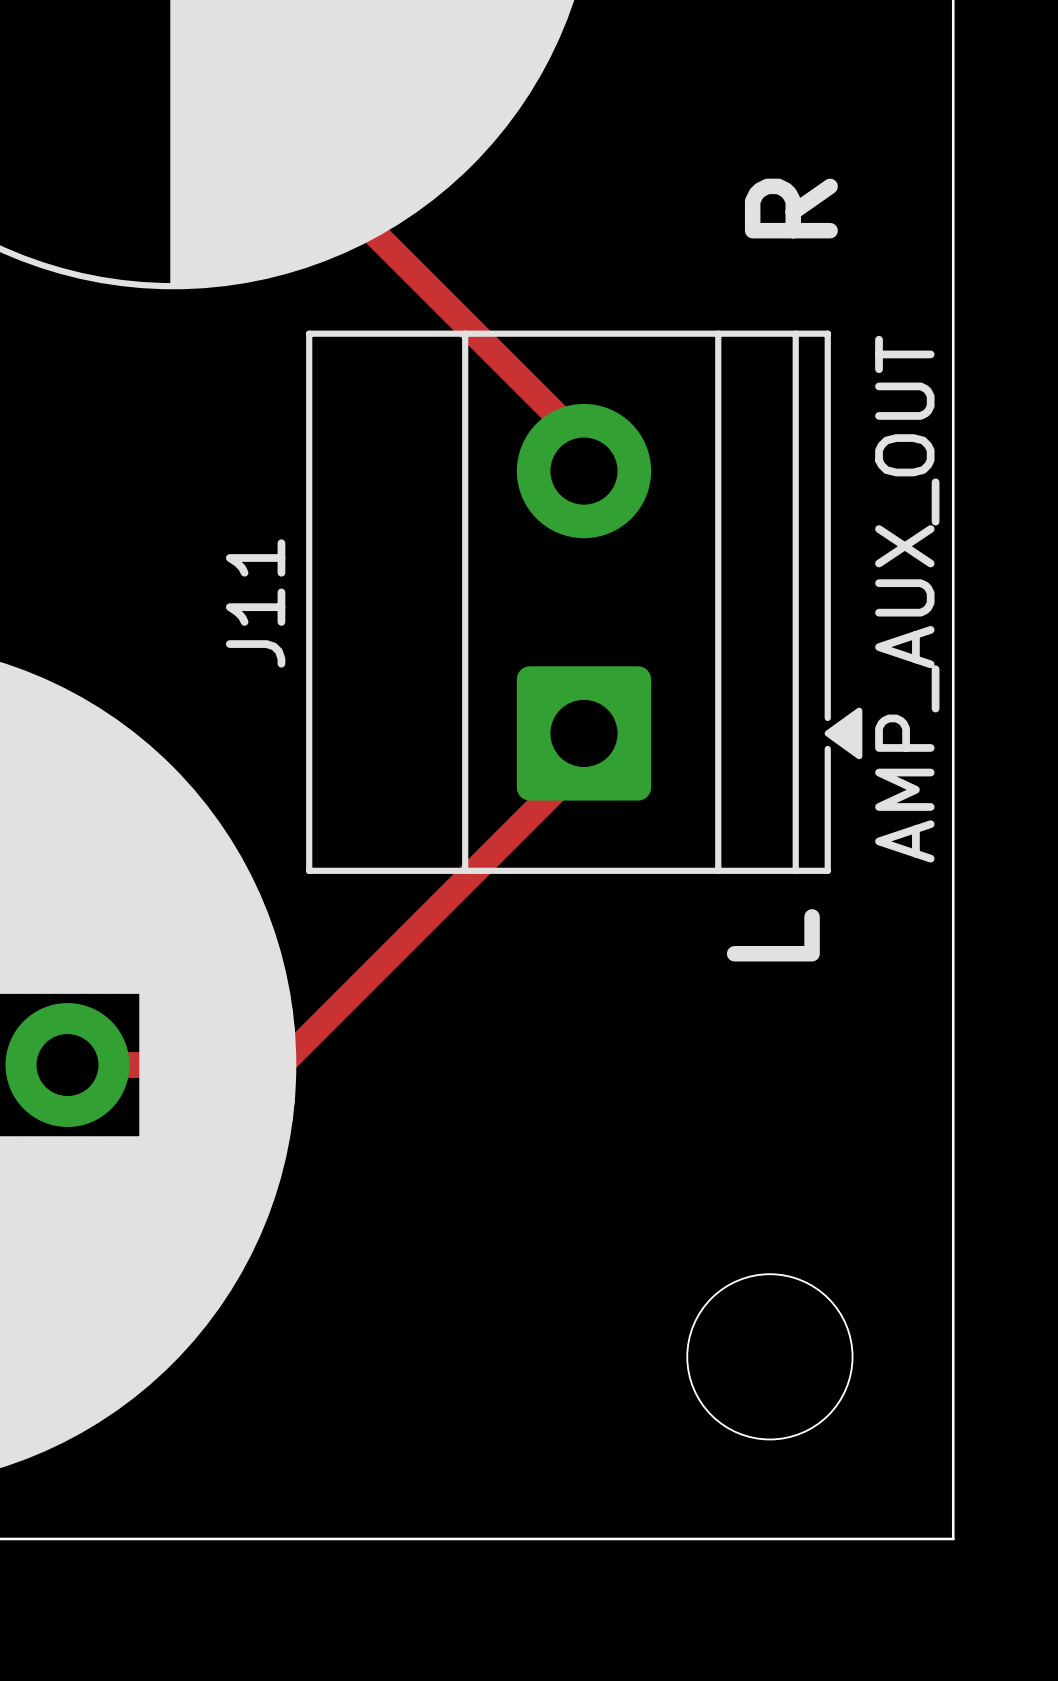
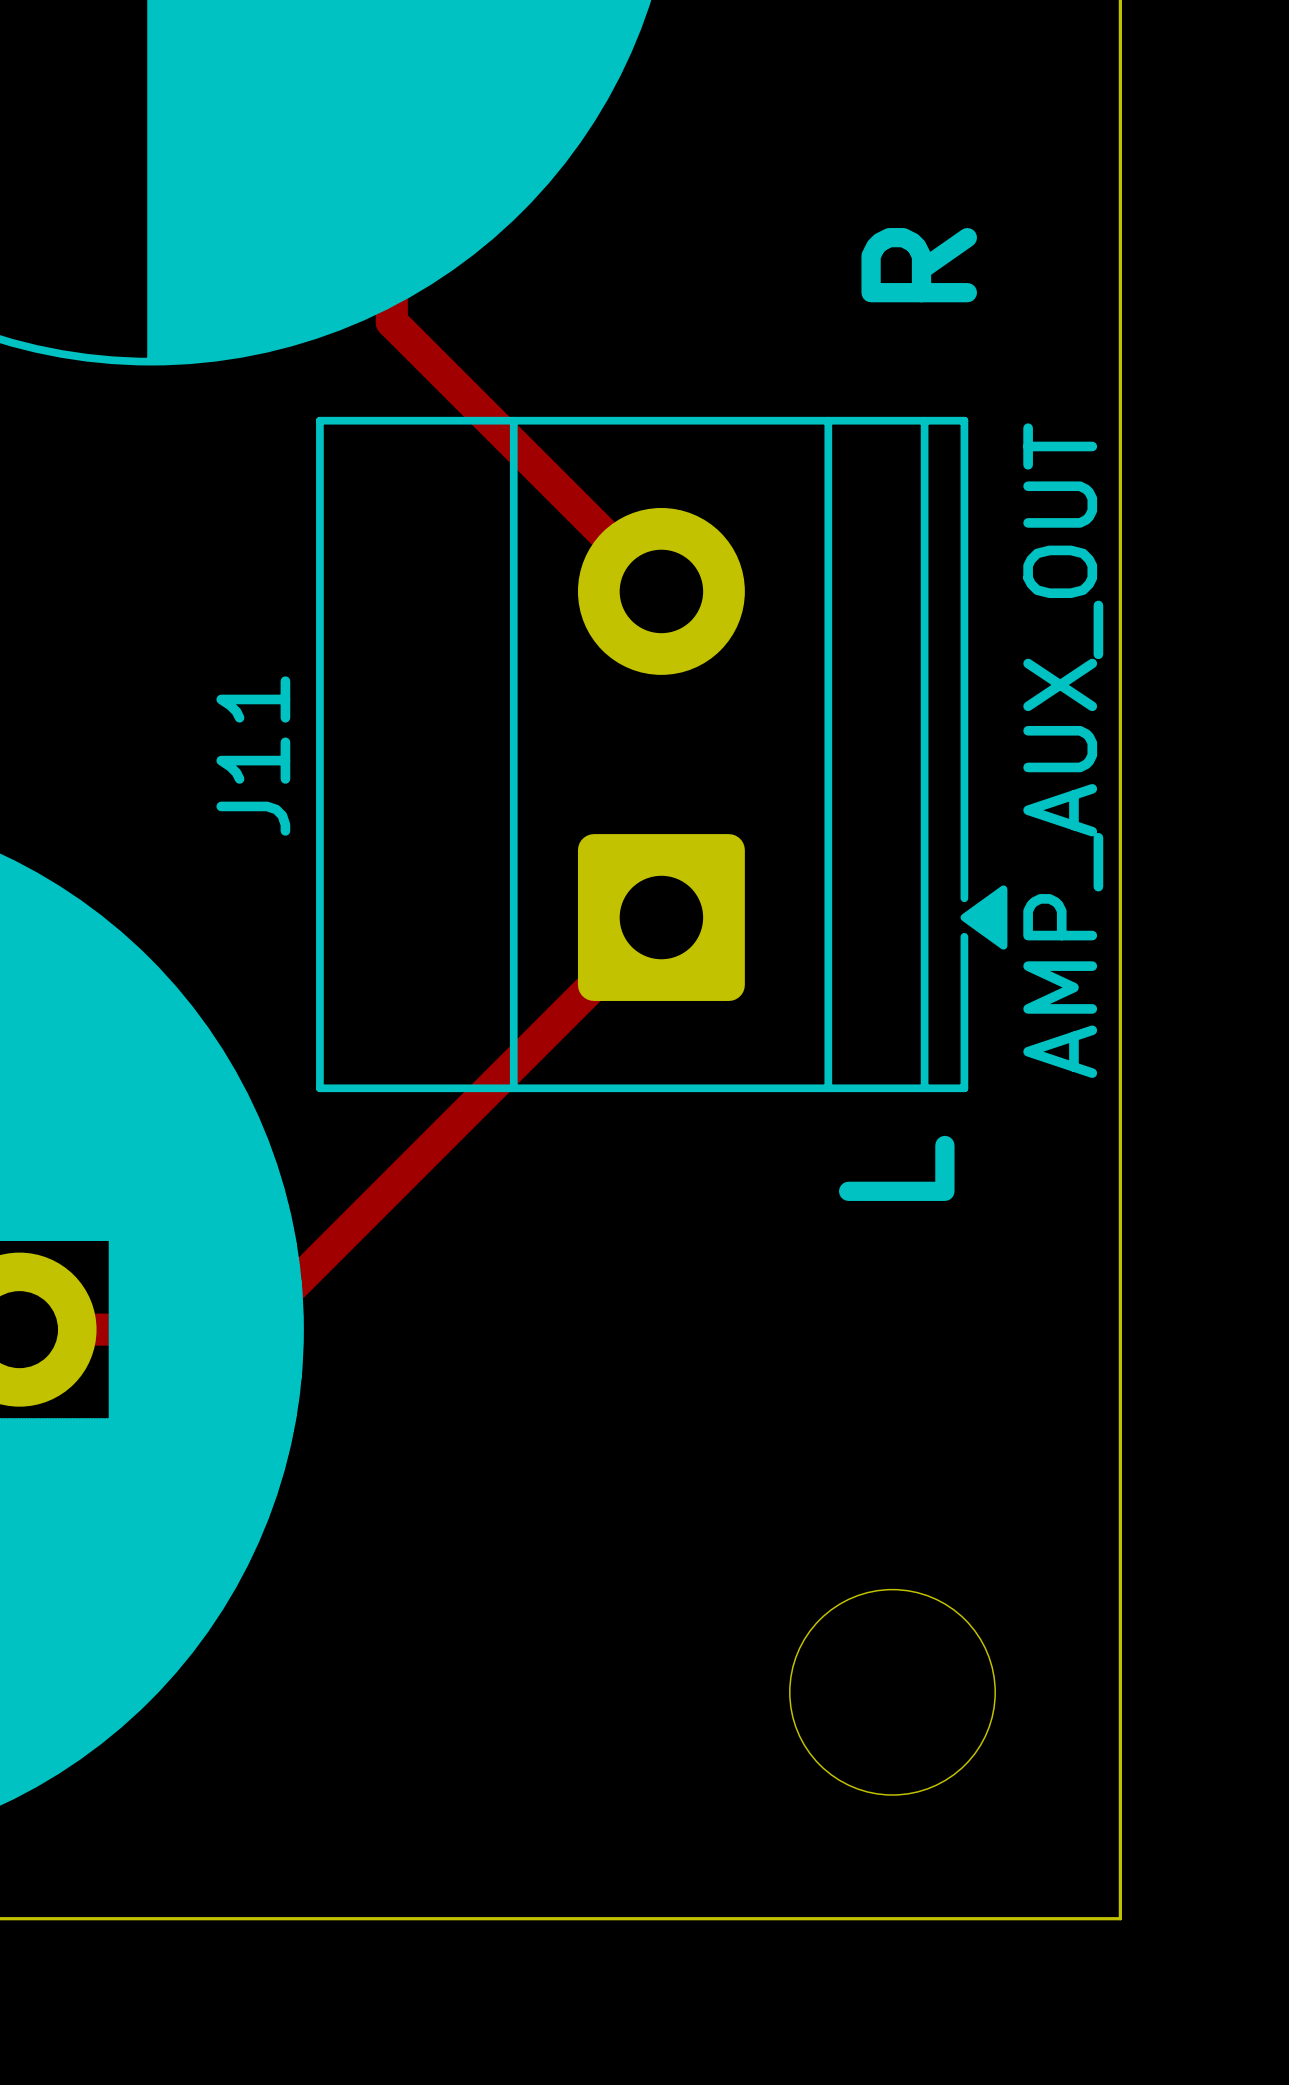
track: (367, 225) (607, 465) (617, 465) -> (391, 286) (391, 321) (661, 591)
track: (625, 728) (617, 728) (280, 1065) (252, 1065) -> (661, 917) (249, 1329)

